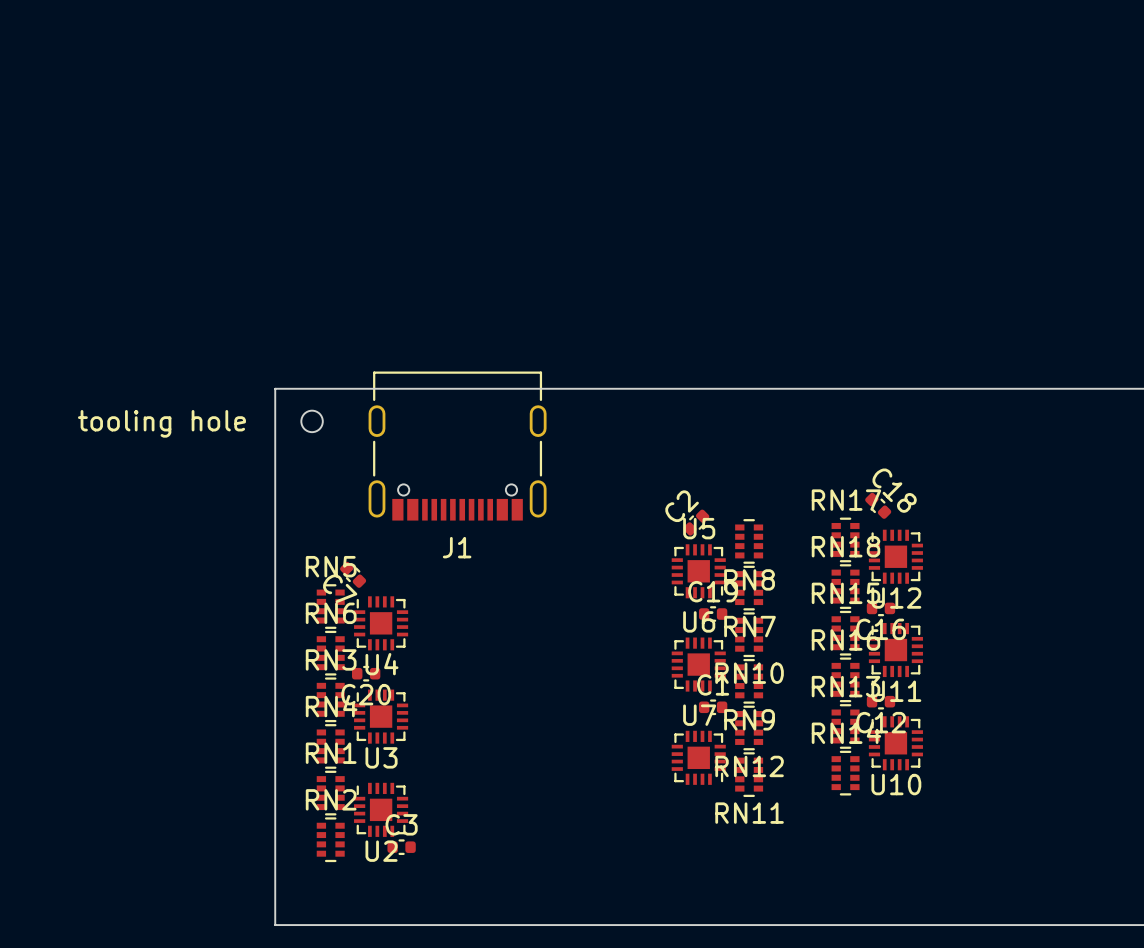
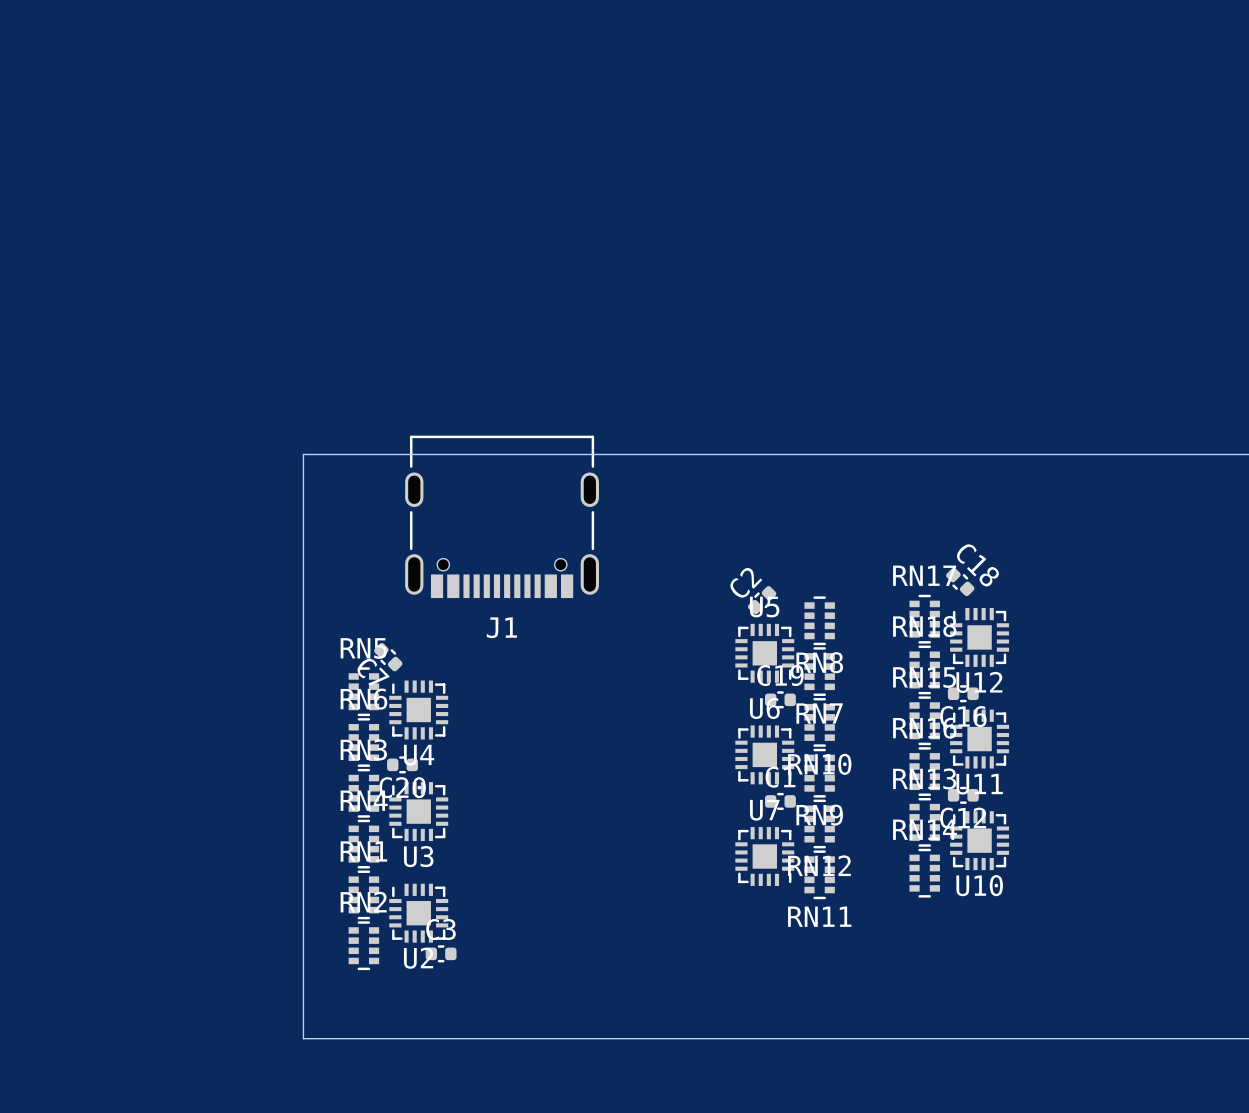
part: (312, 421) -> none

